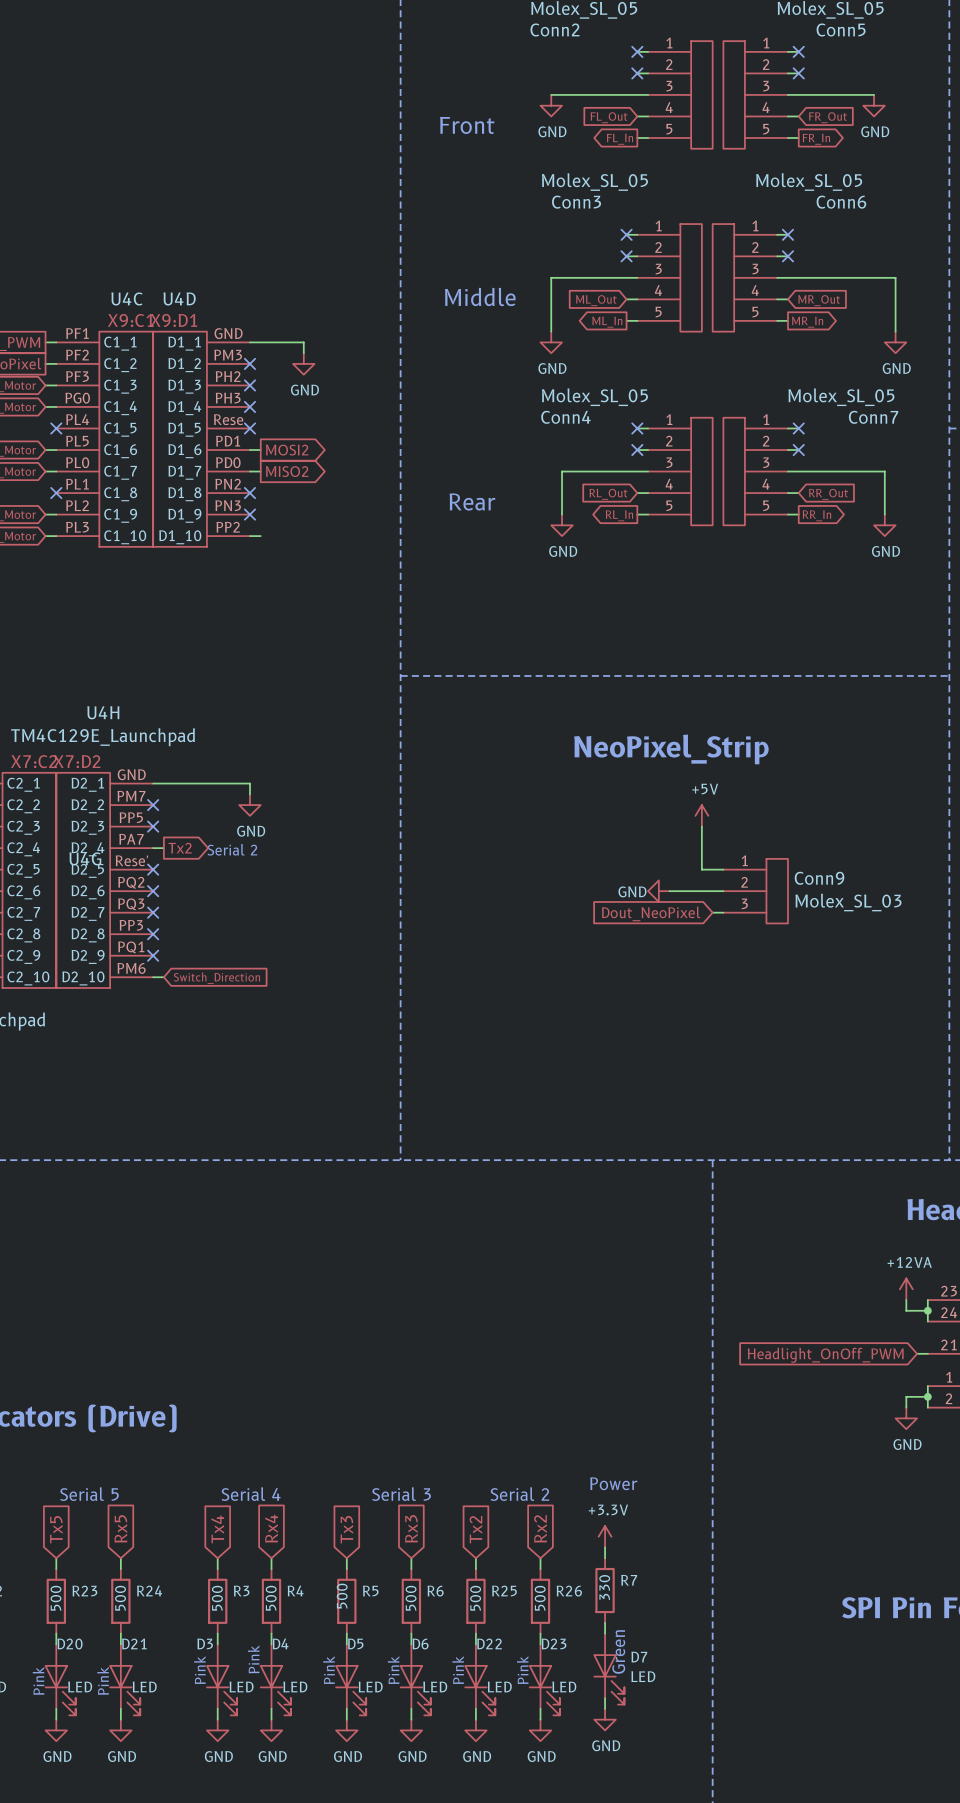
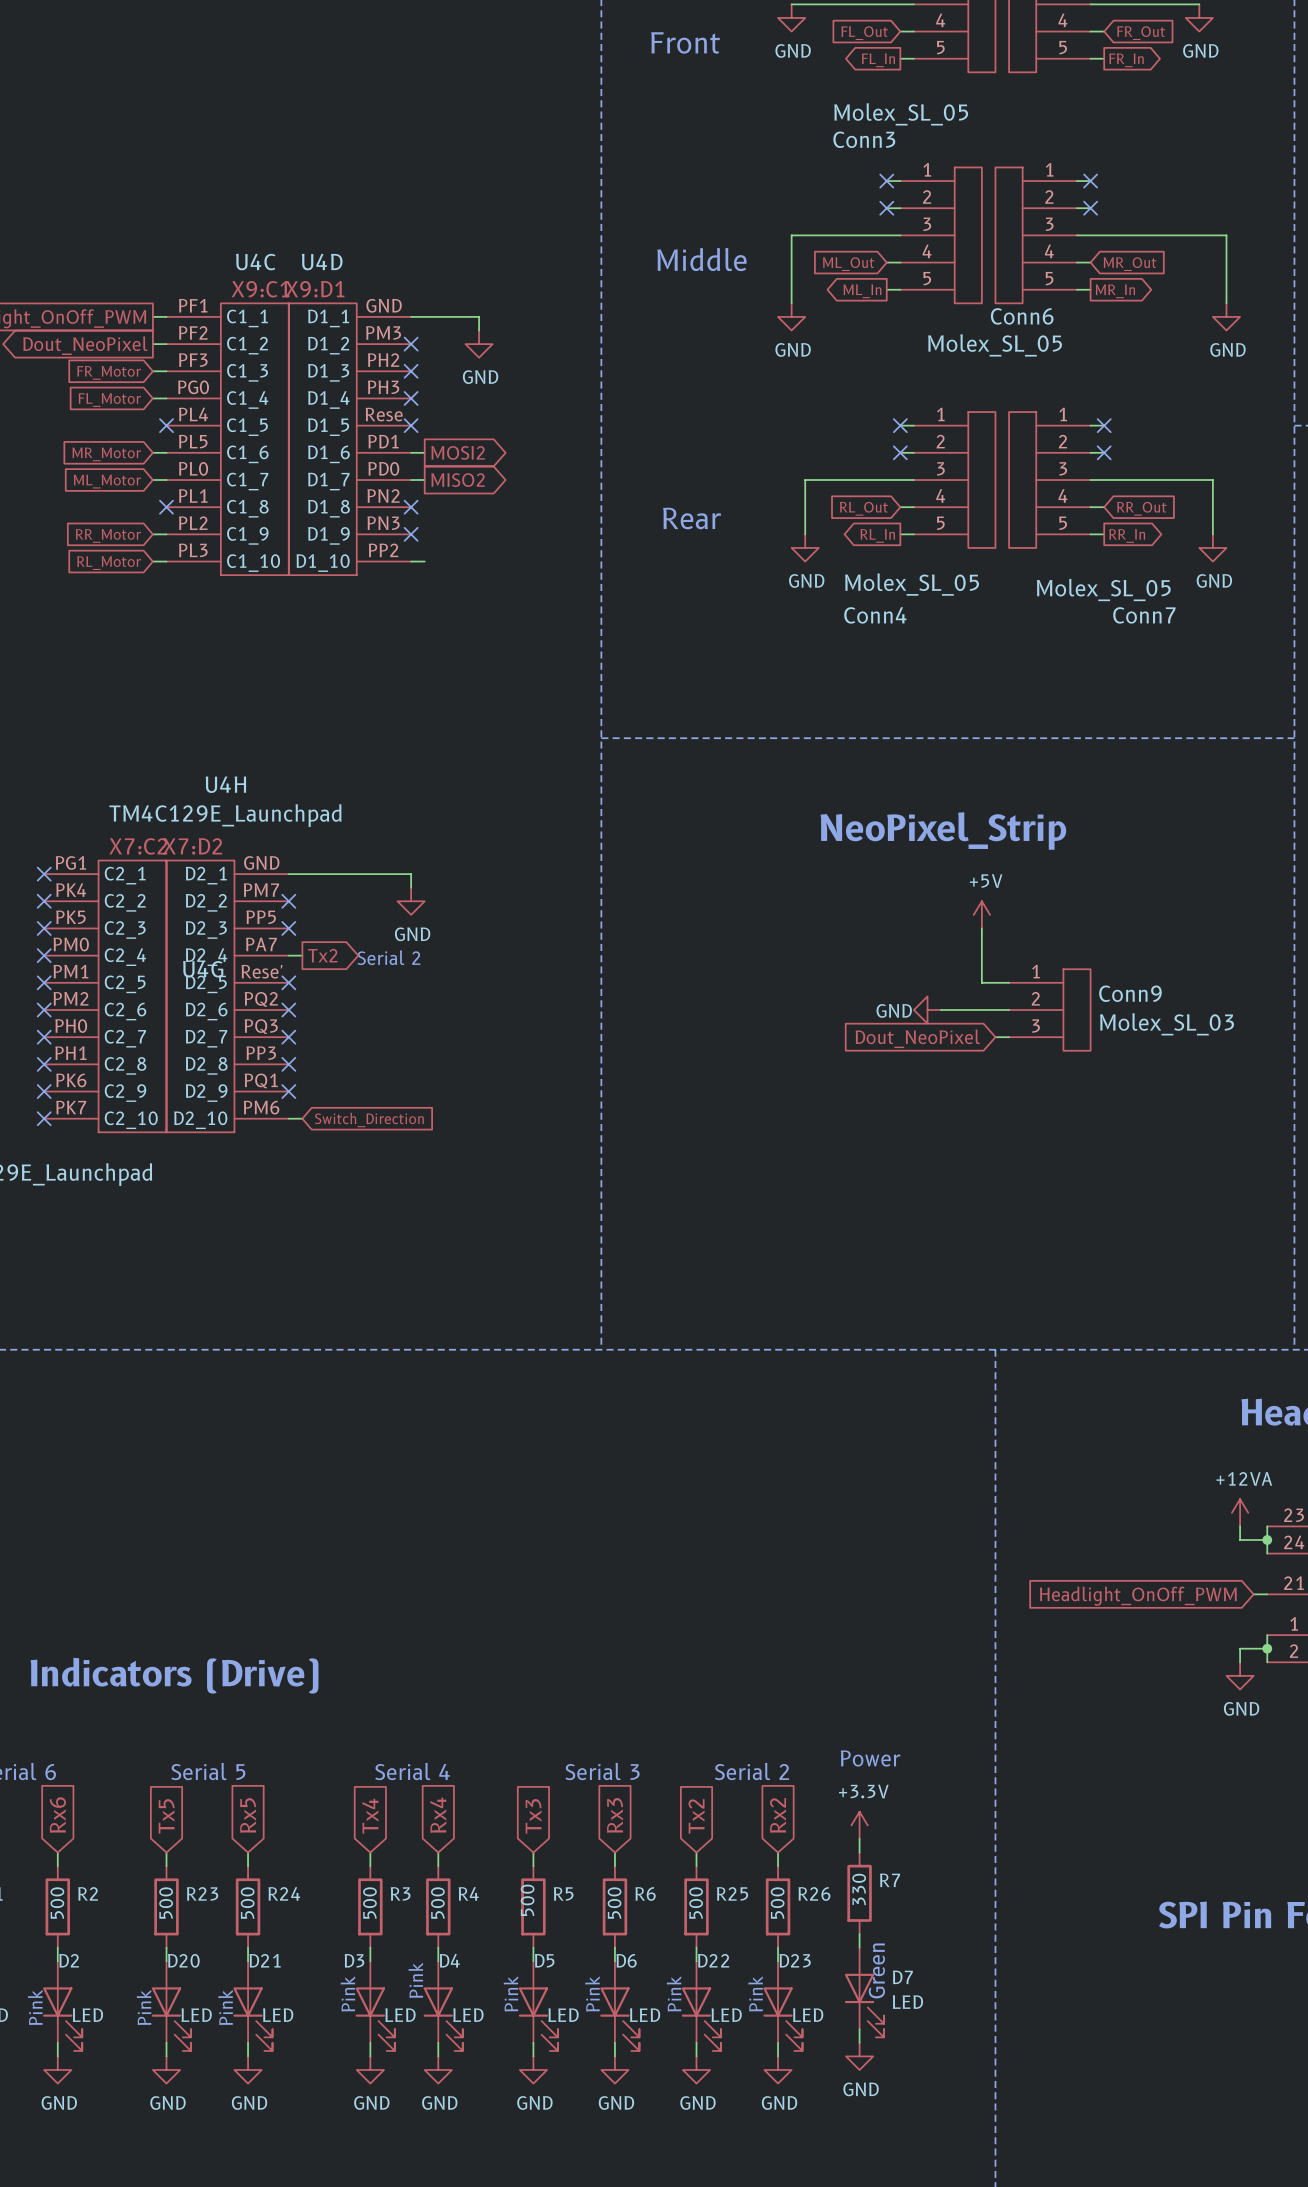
Conn3 value position: Molex_SL_05 (594, 182) -> Molex_SL_05 (901, 114)
Conn6 value position: Molex_SL_05 (809, 182) -> Molex_SL_05 (995, 345)
Conn3 name position: Conn3 (576, 202) -> Conn3 (864, 139)
Conn6 name position: Conn6 (841, 202) -> Conn6 (1022, 316)
Conn4 value position: Molex_SL_05 (594, 397) -> Molex_SL_05 (912, 584)
Conn7 value position: Molex_SL_05 (841, 397) -> Molex_SL_05 (1103, 590)
Conn4 name position: Conn4 (565, 417) -> Conn4 (875, 615)
Conn7 name position: Conn7 (873, 417) -> Conn7 (1144, 615)

